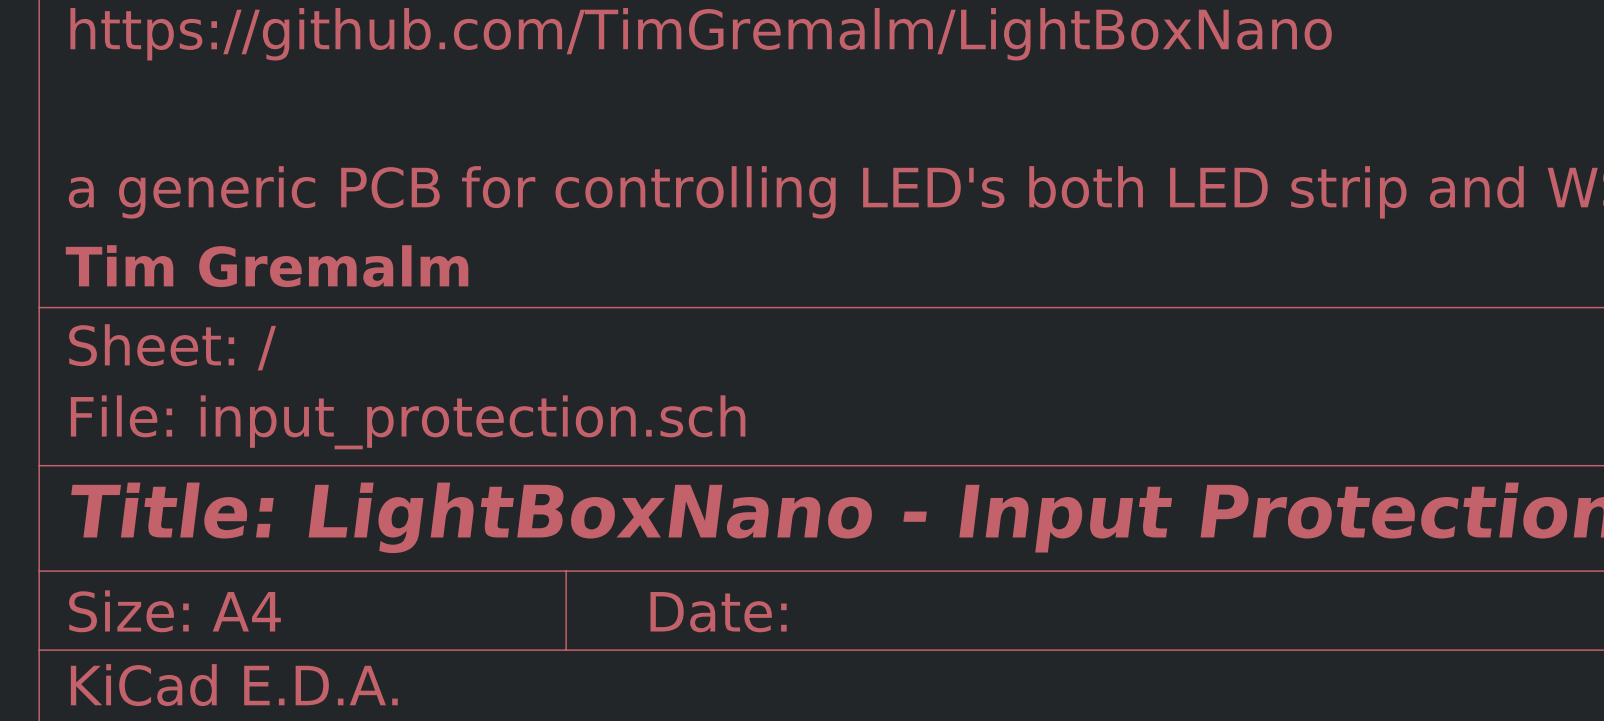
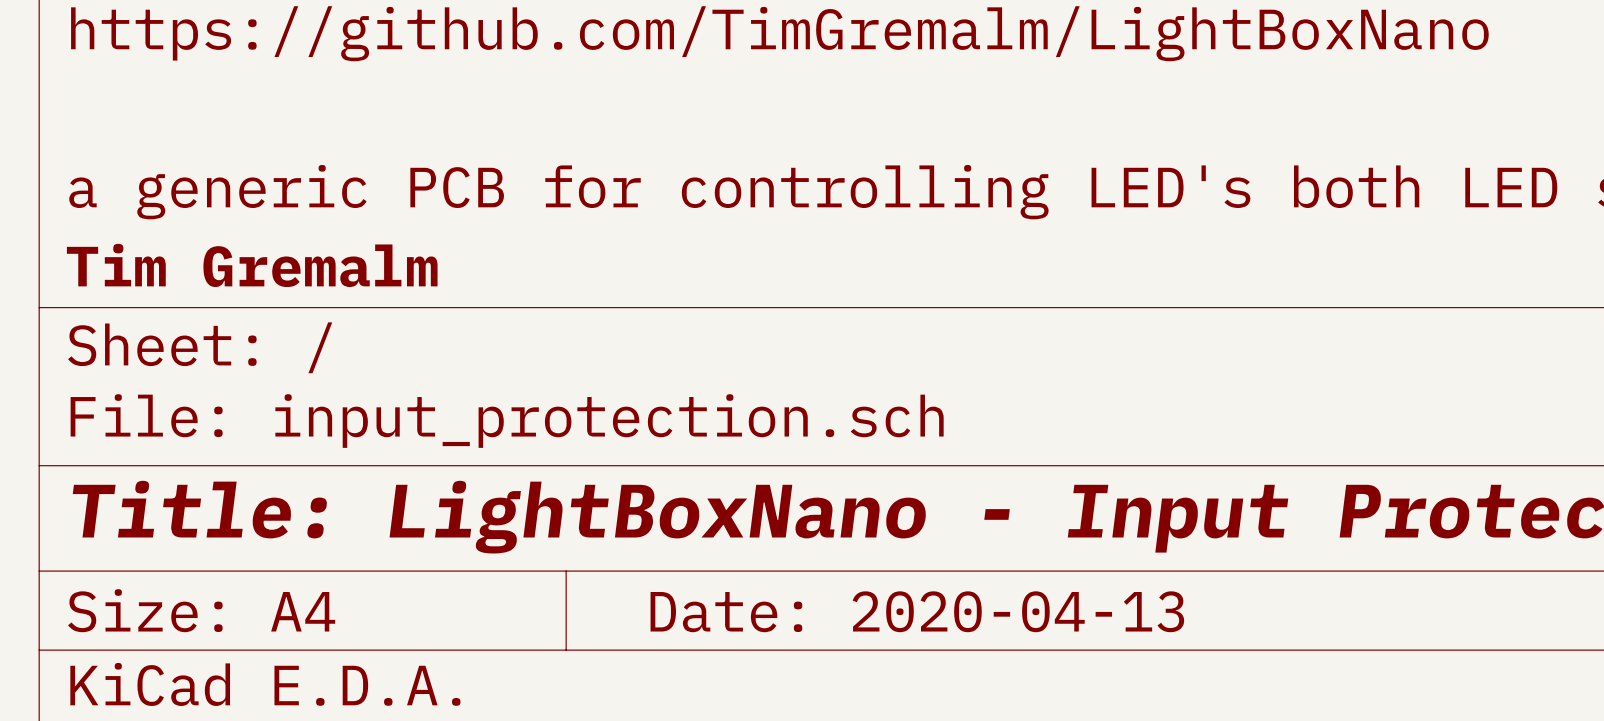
title block: Date: (718, 612) -> Date: 2020-04-13 (917, 611)

